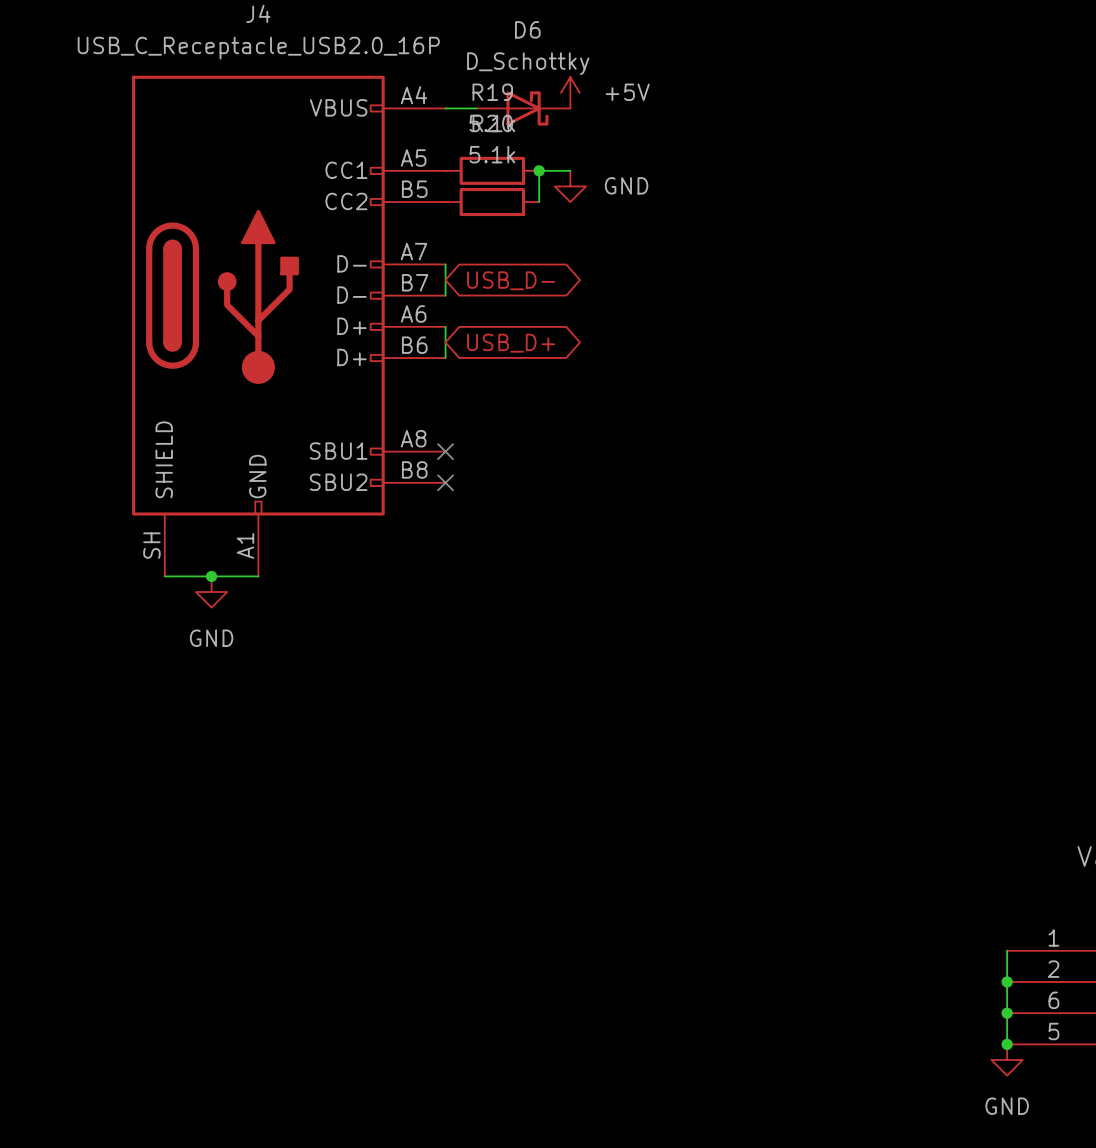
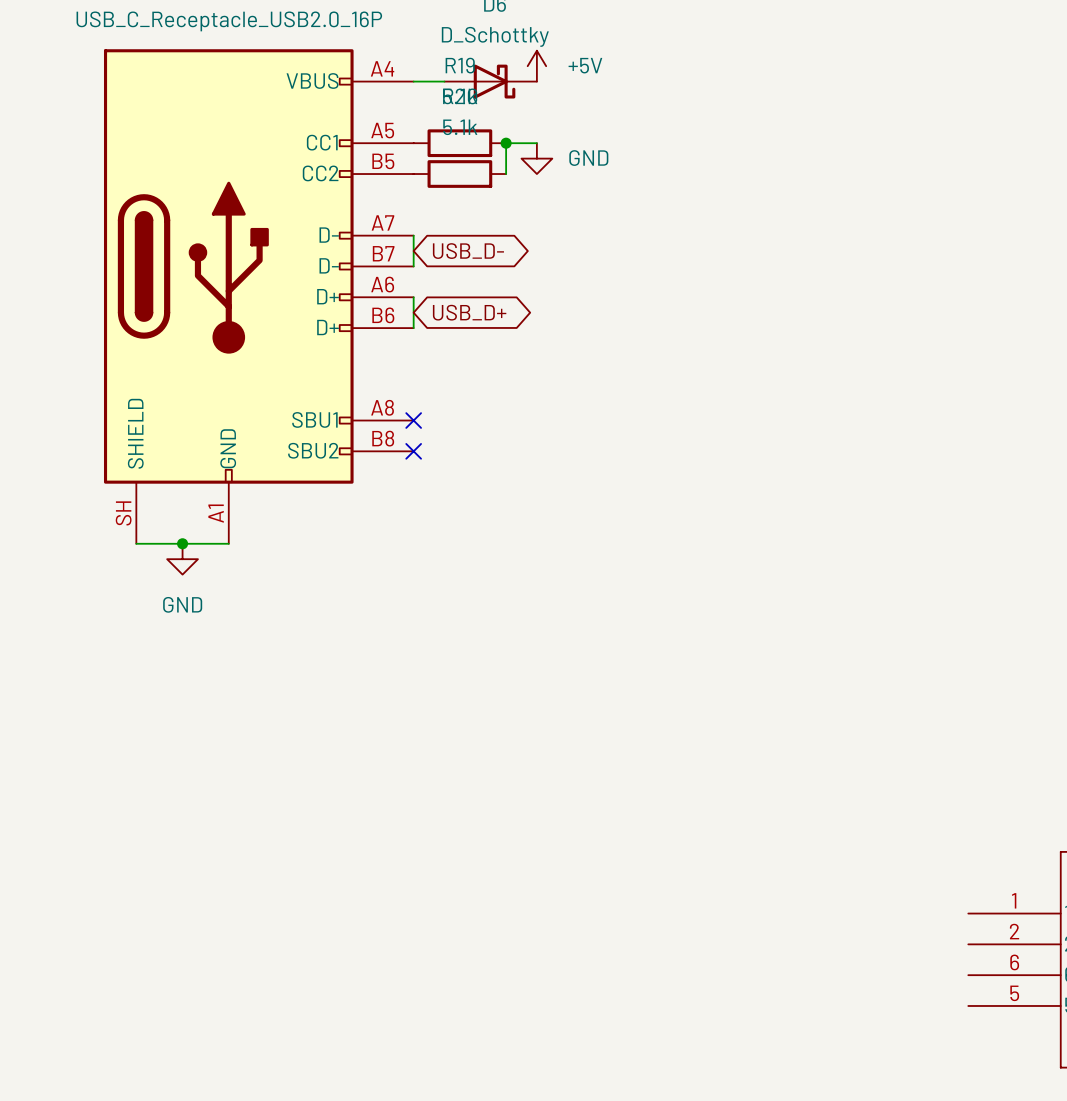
wire: (1007, 950) (1007, 1044) -> none
junction: (1007, 981) -> none
junction: (1007, 1013) -> none
junction: (1007, 1044) -> none
power symbol: GND (1007, 1059) -> none

